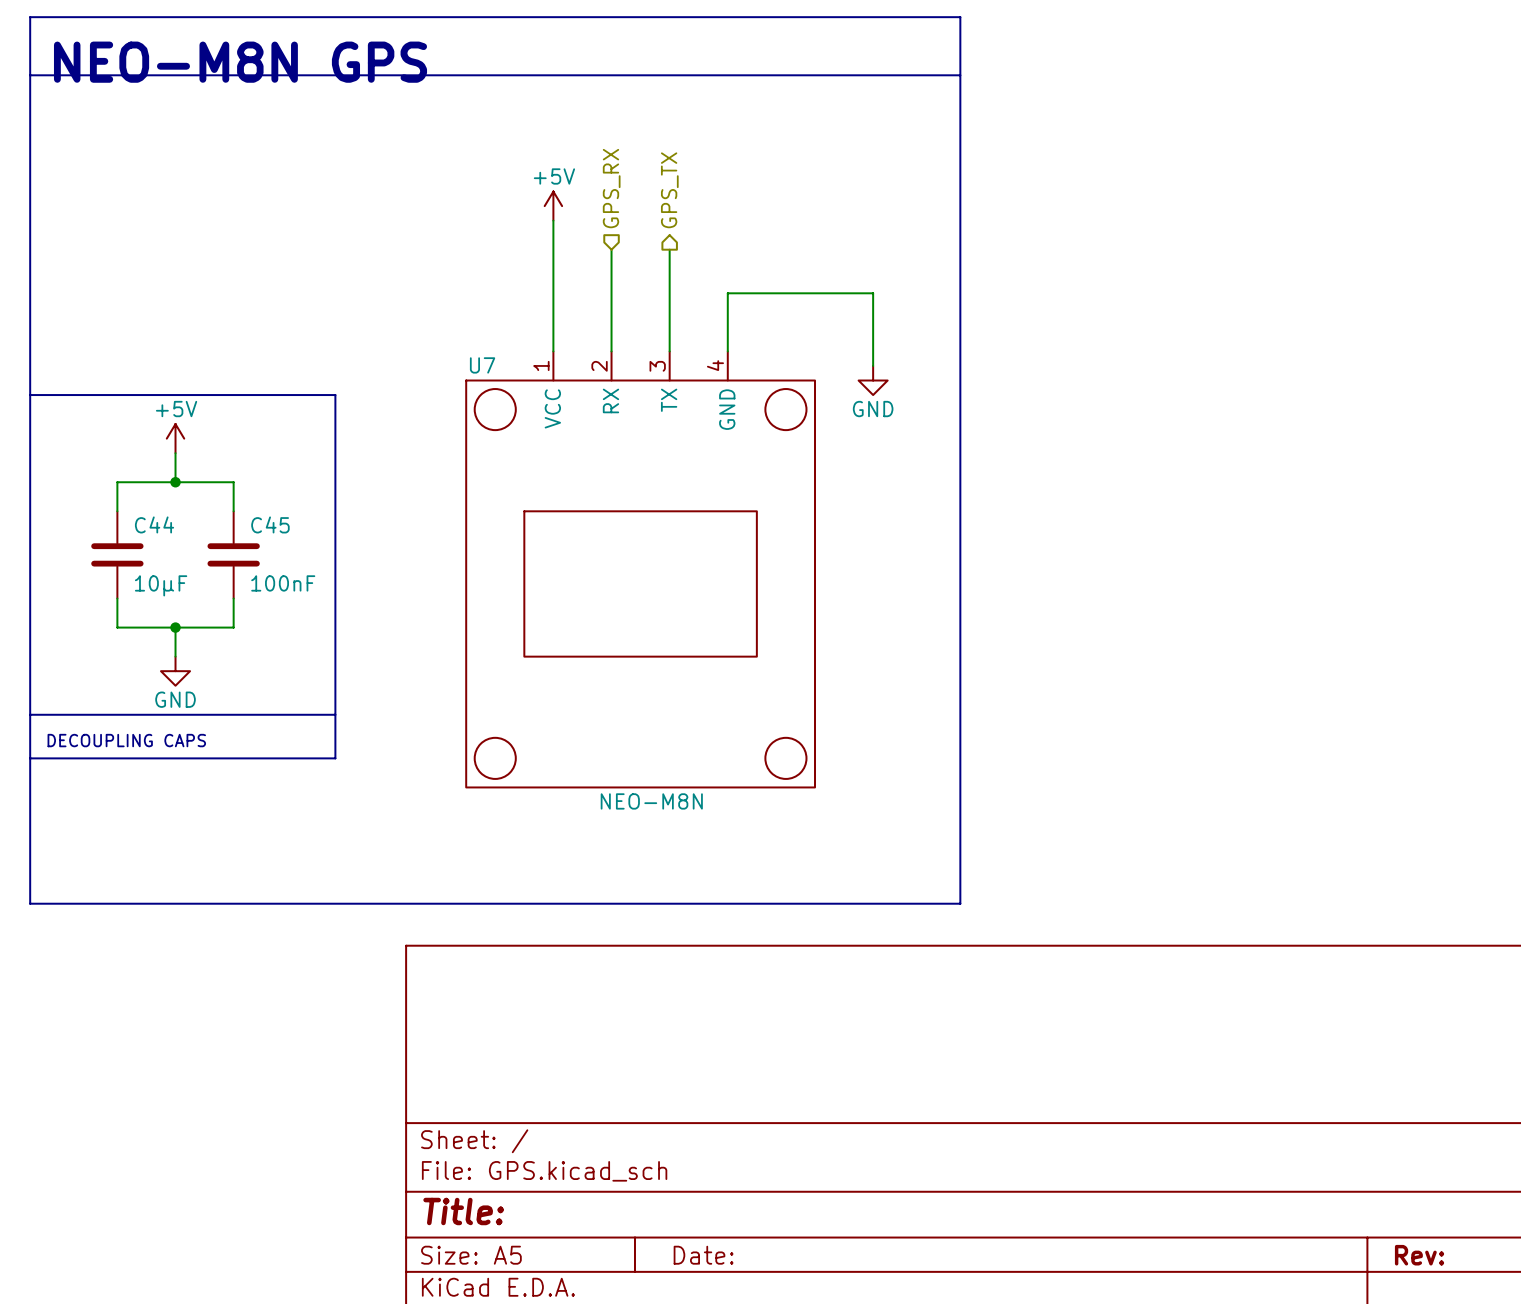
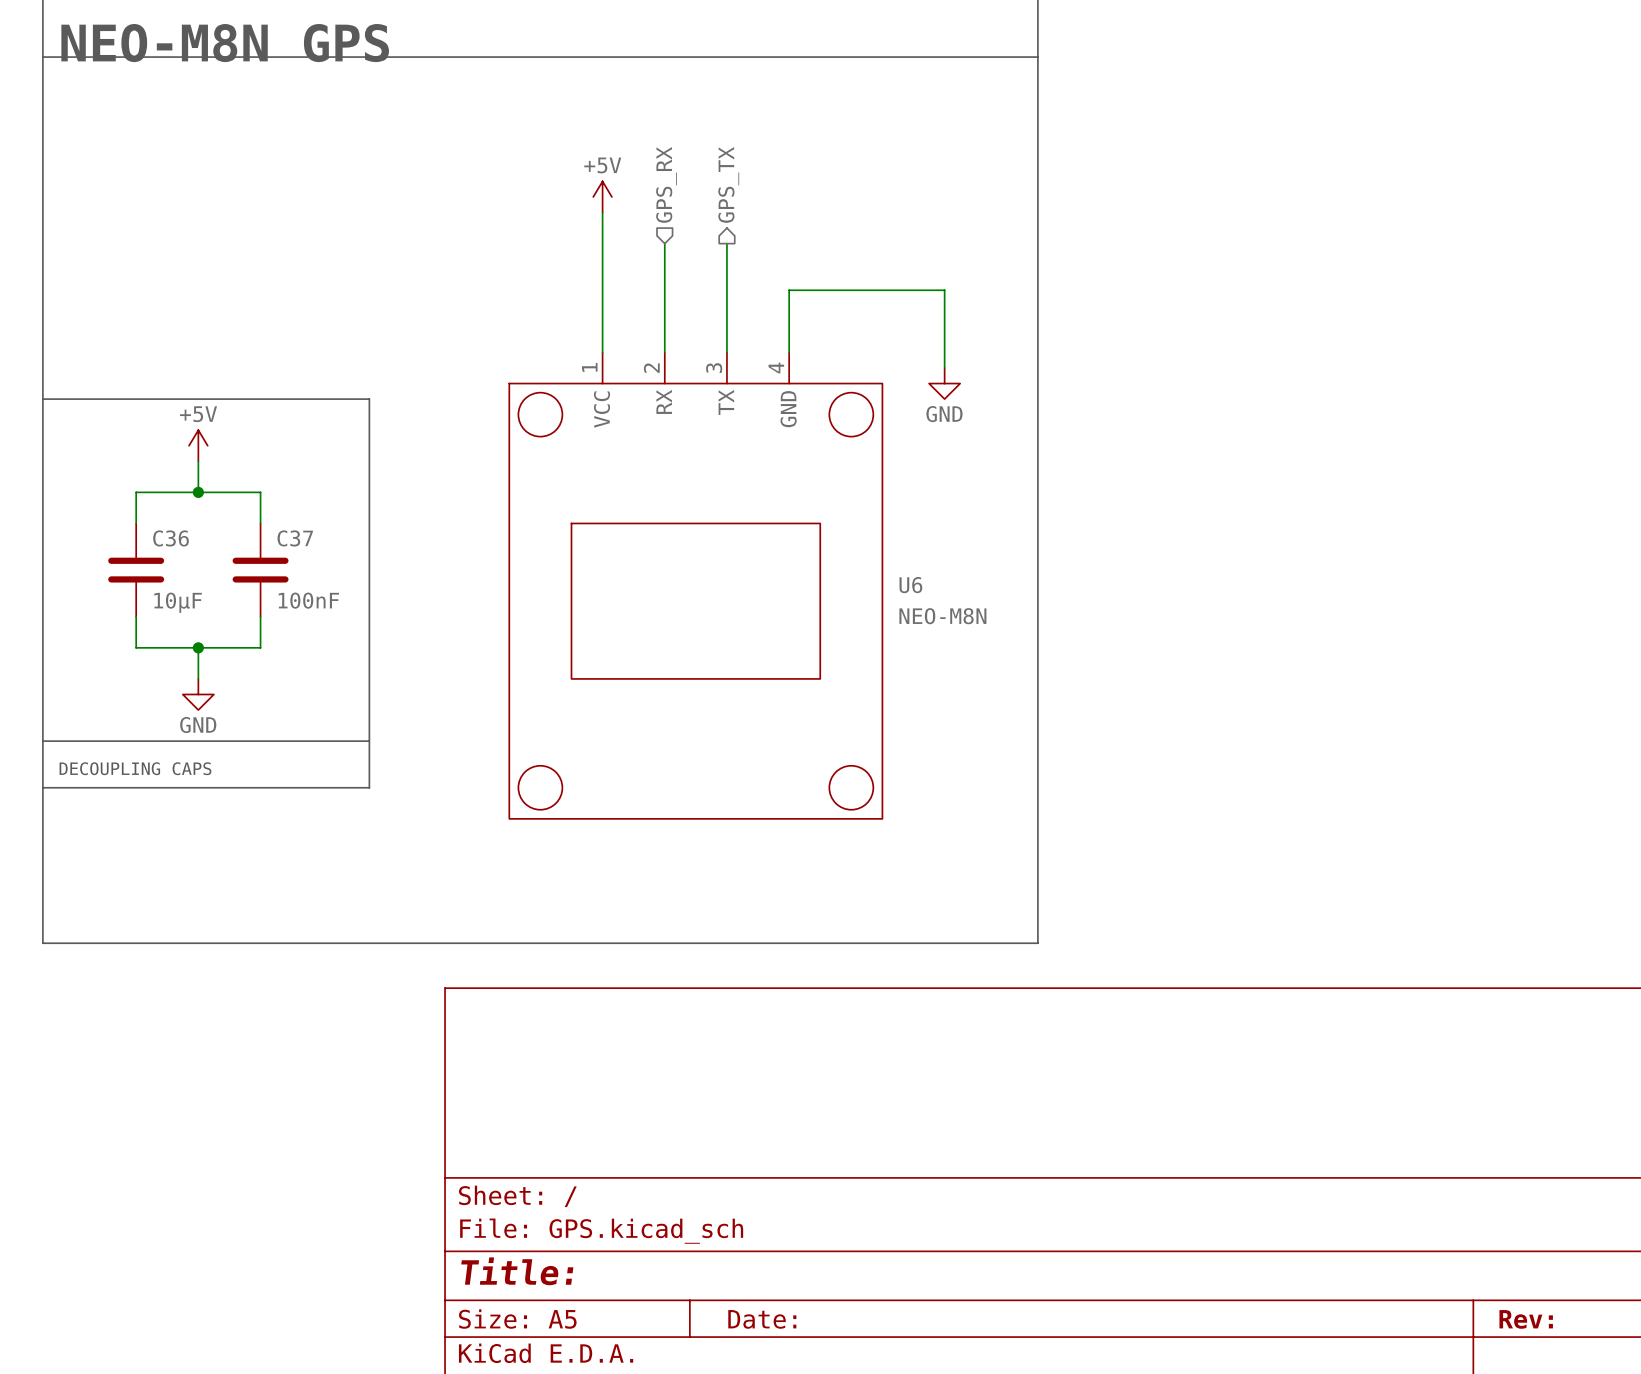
U7 name: U7 (482, 365) -> U6 (910, 585)
C44 name: C44 (154, 524) -> C36 (171, 538)
C45 name: C45 (270, 524) -> C37 (295, 538)
U7 value position: NEO-M8N (651, 801) -> NEO-M8N (942, 616)

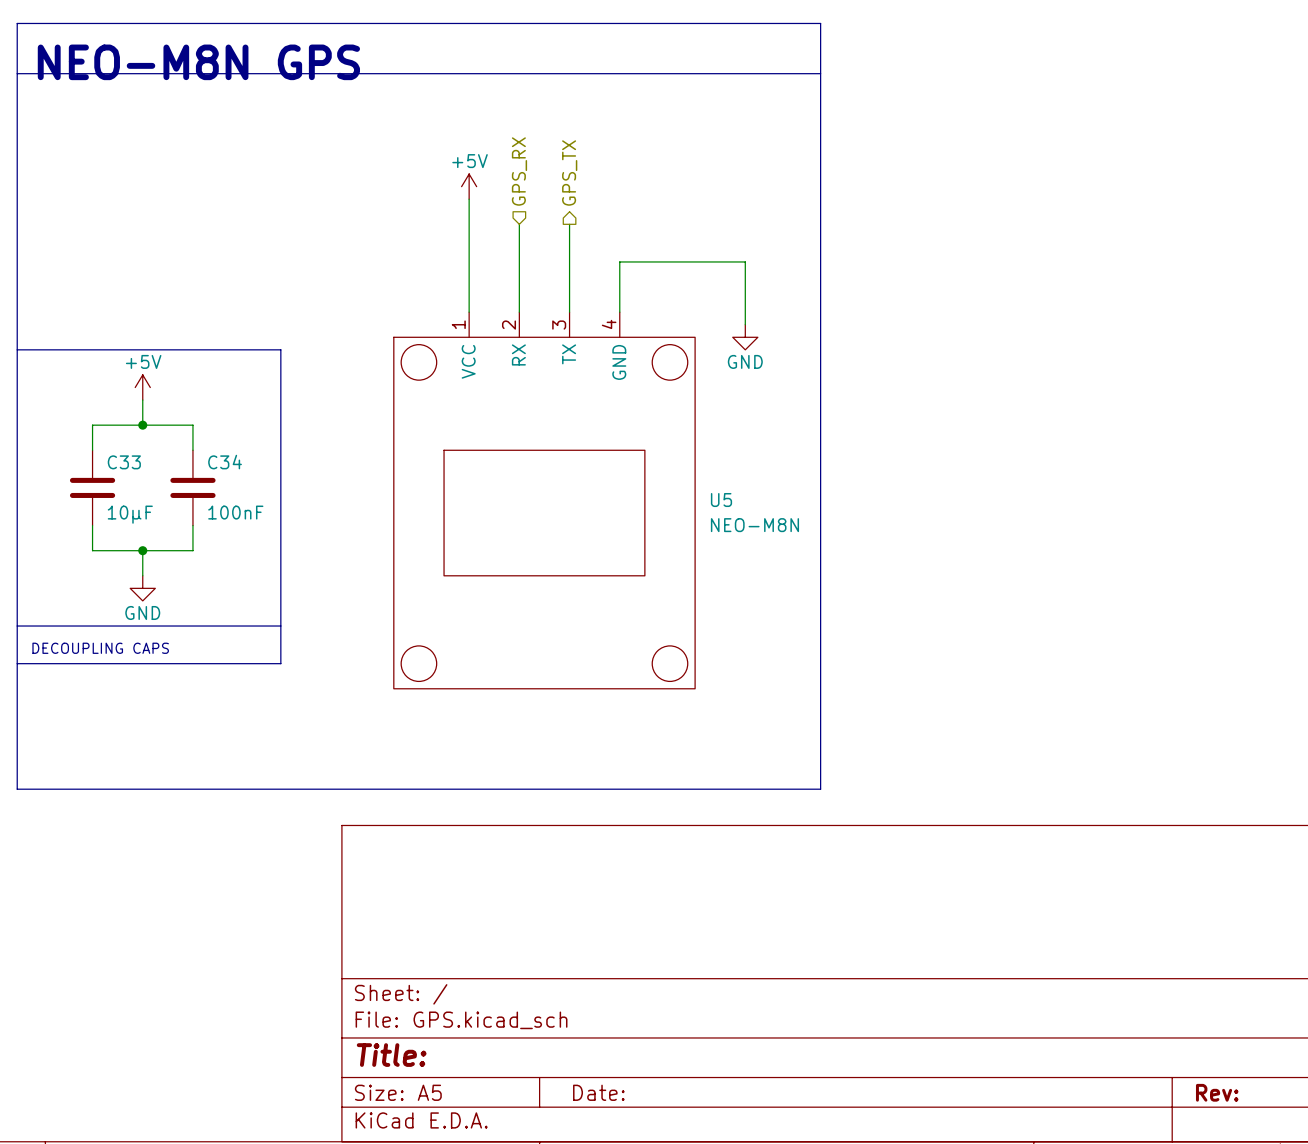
C36 name: C36 (171, 538) -> C33 (124, 462)
C37 name: C37 (295, 538) -> C34 (225, 462)
U6 name: U6 (910, 585) -> U5 (721, 500)

